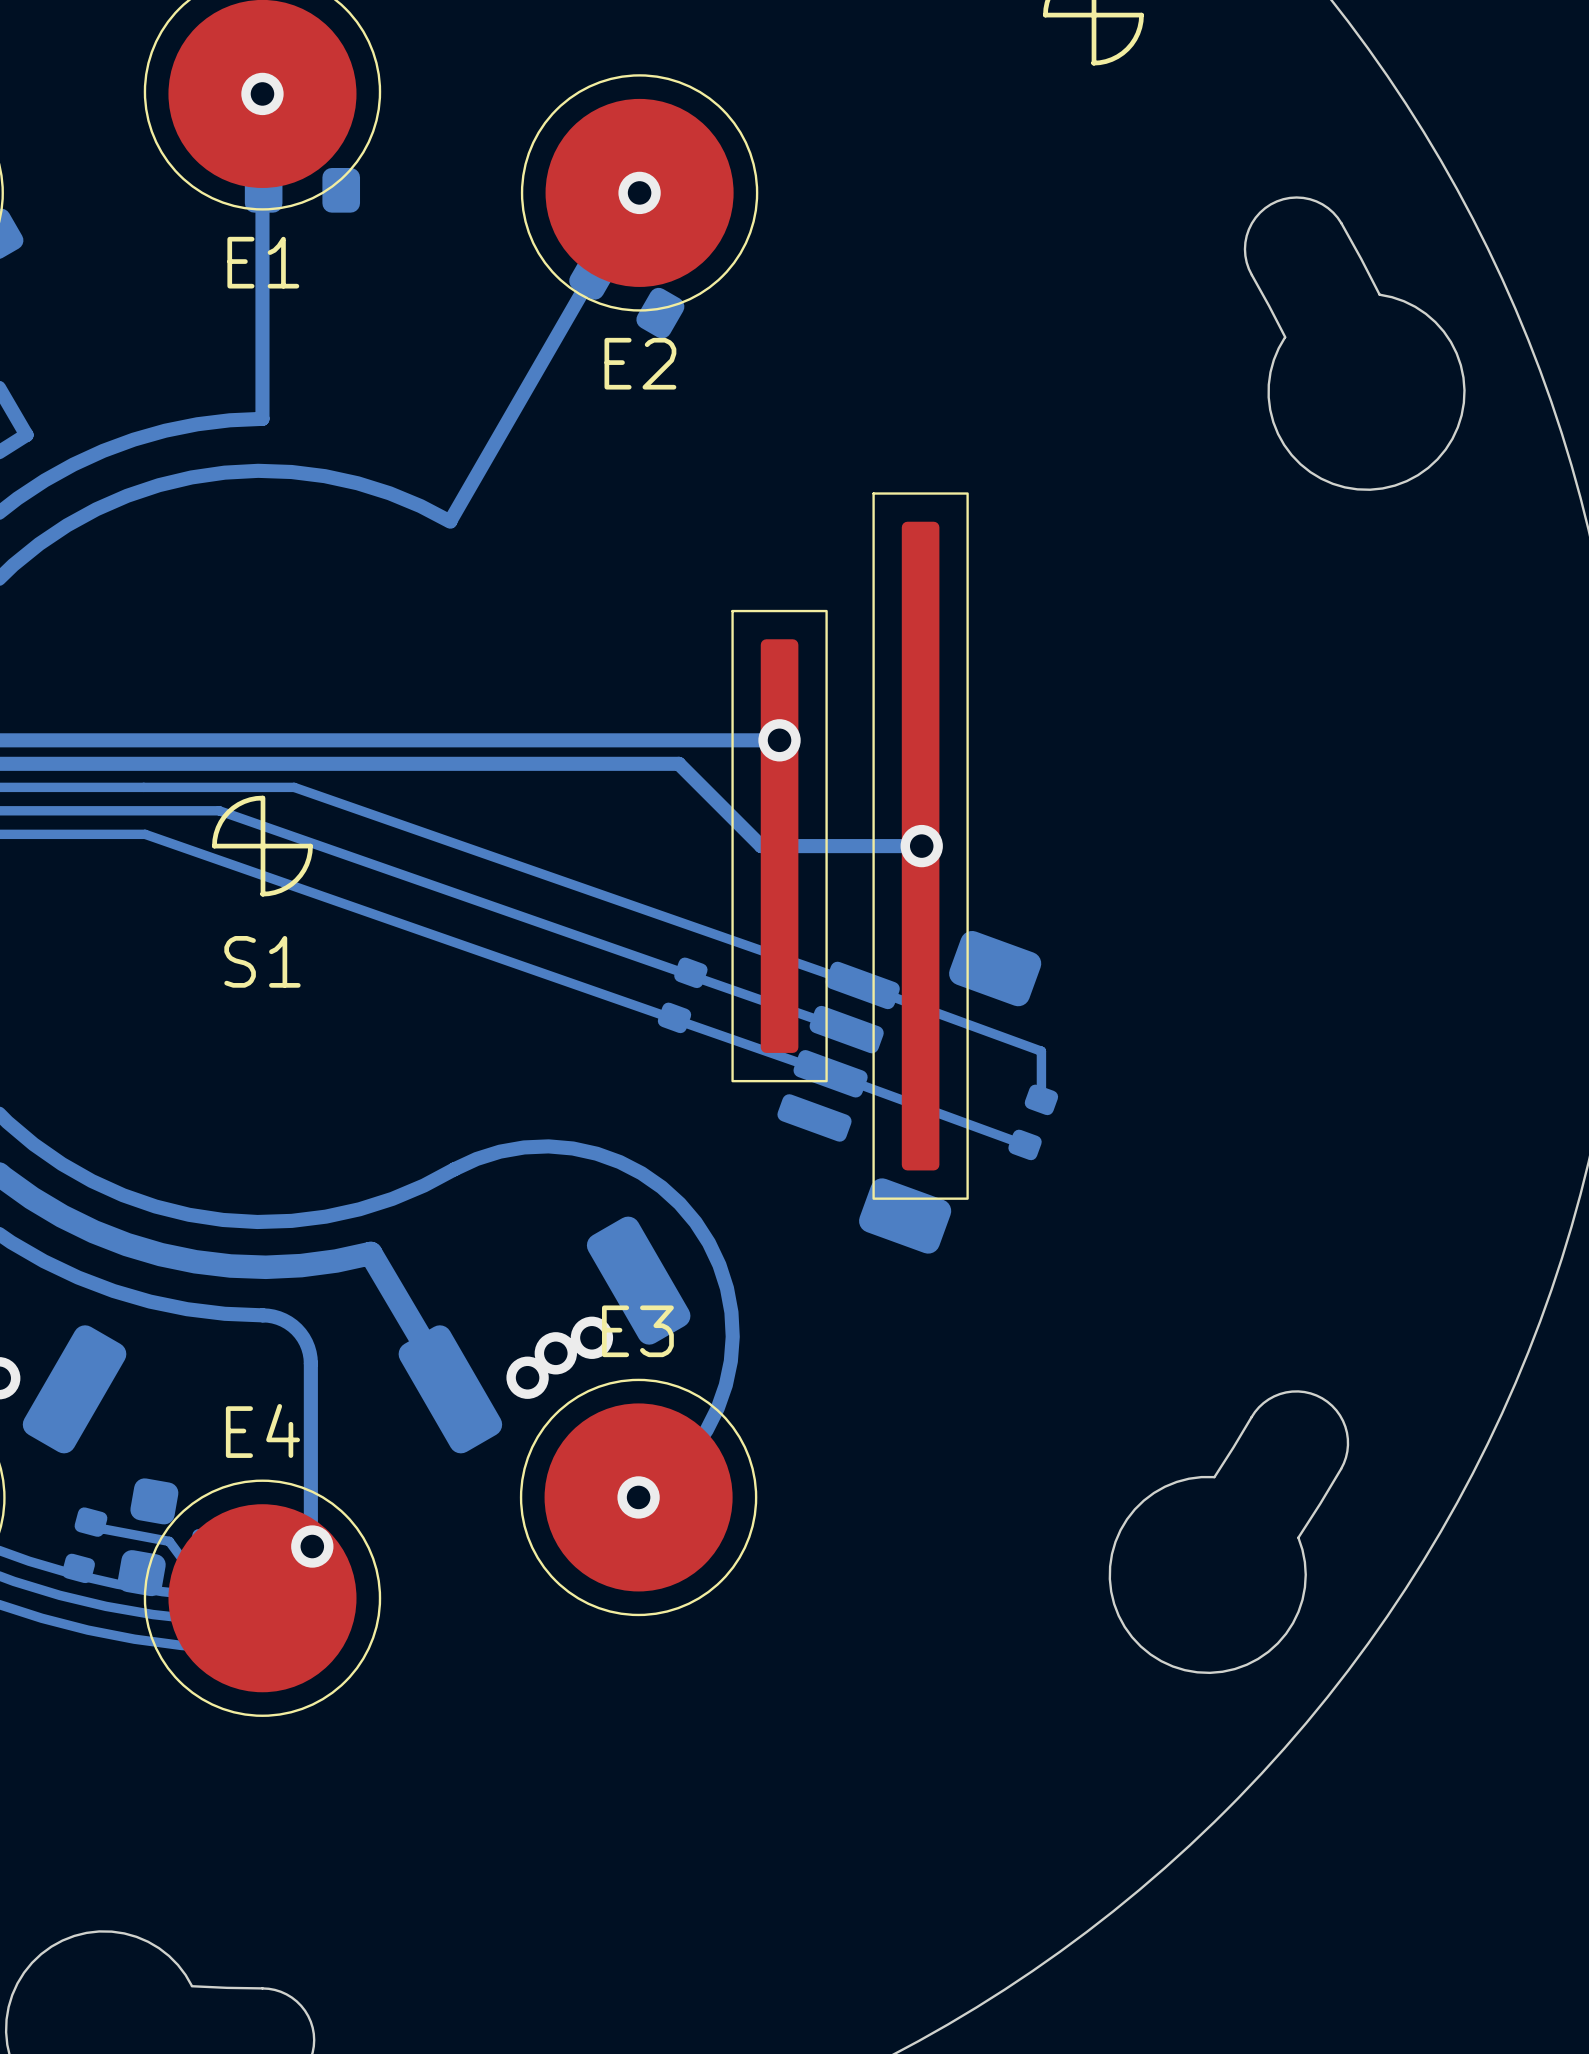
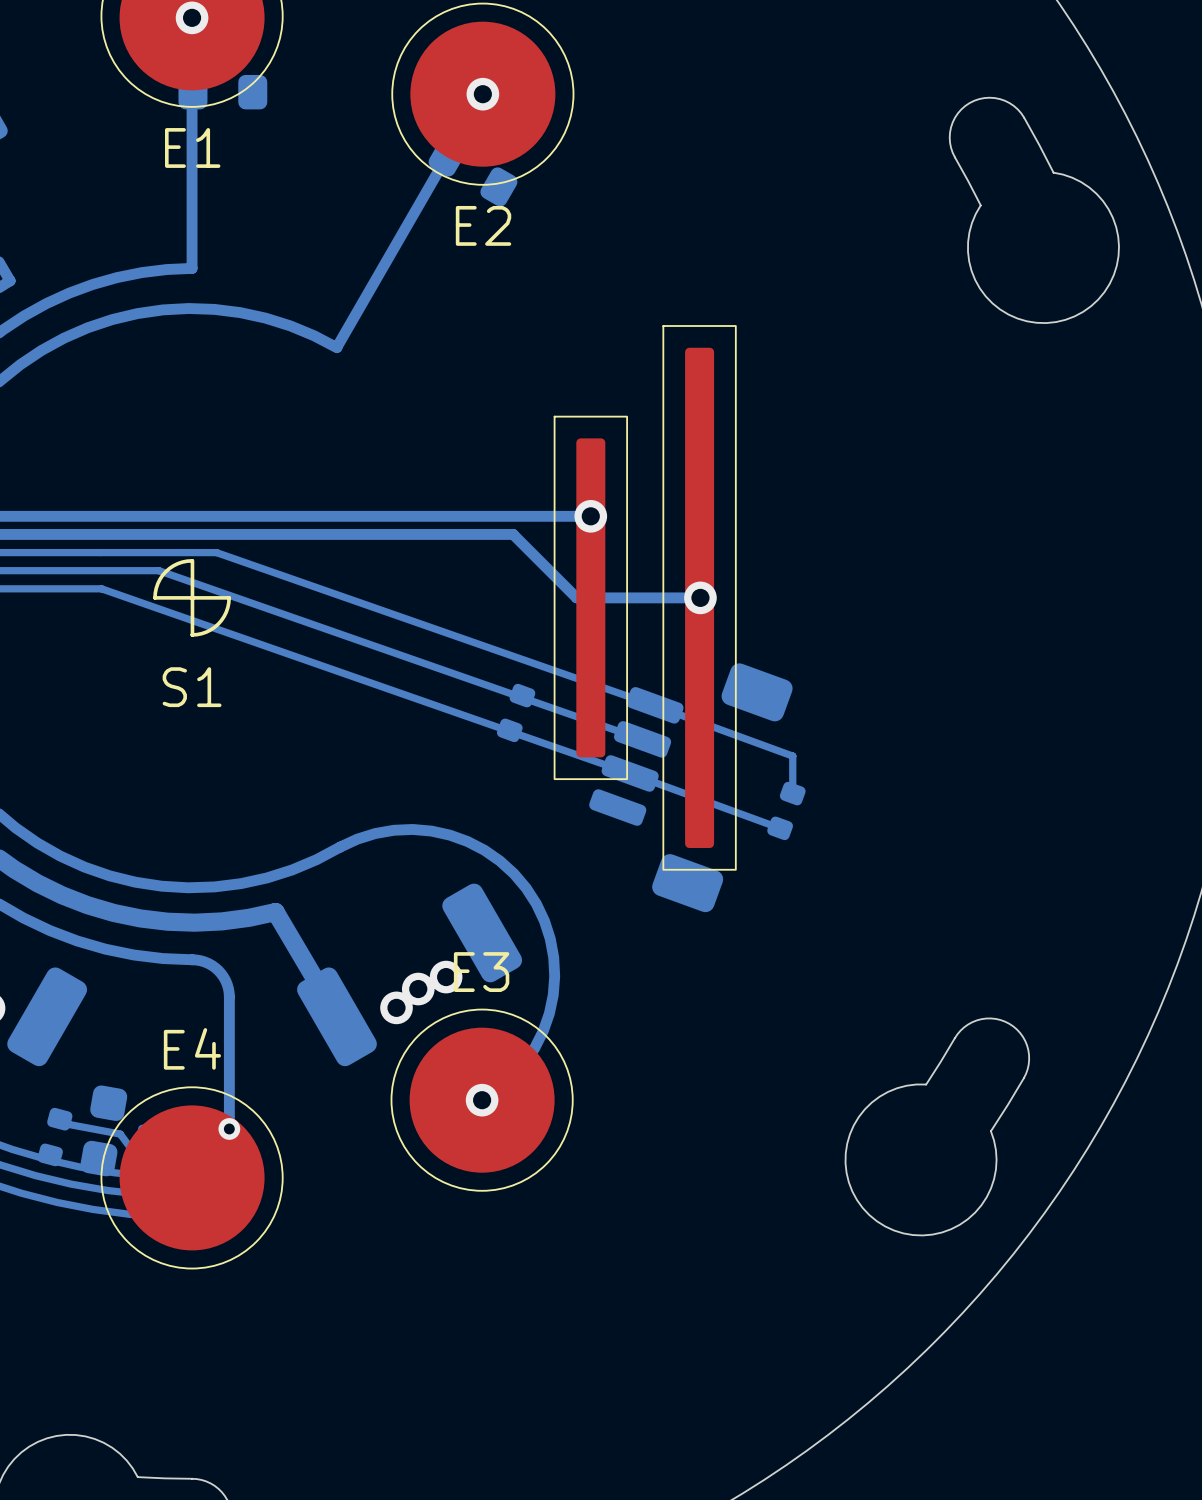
via size: [291, 1525, 334, 1568] -> [218, 1118, 241, 1140]

